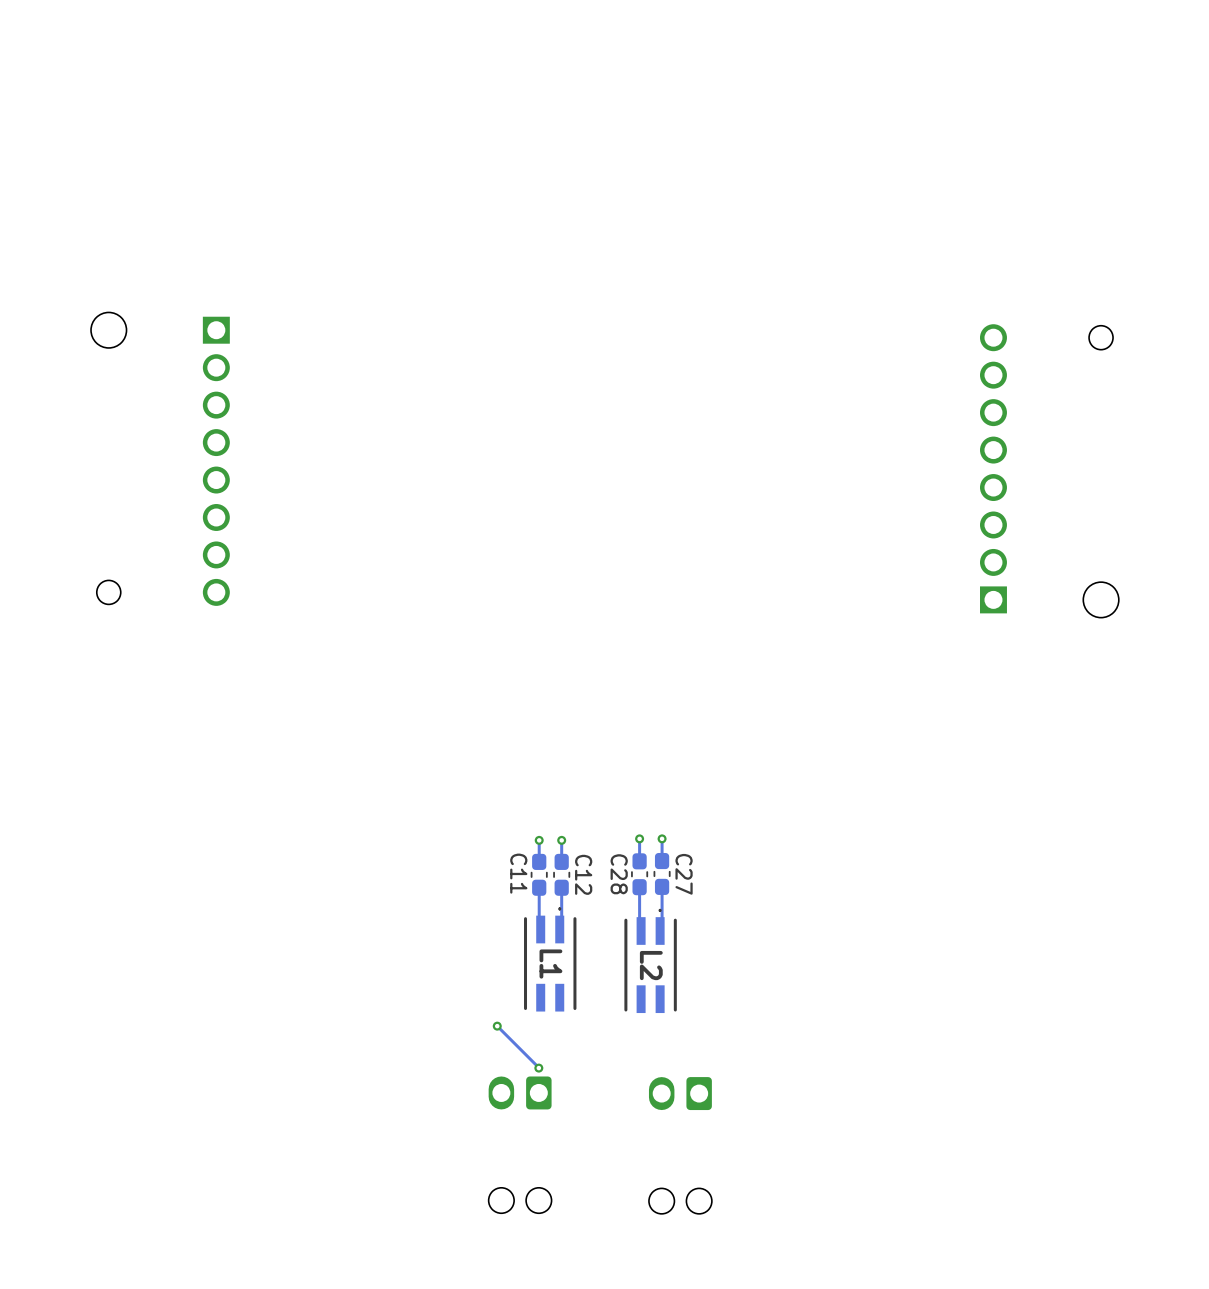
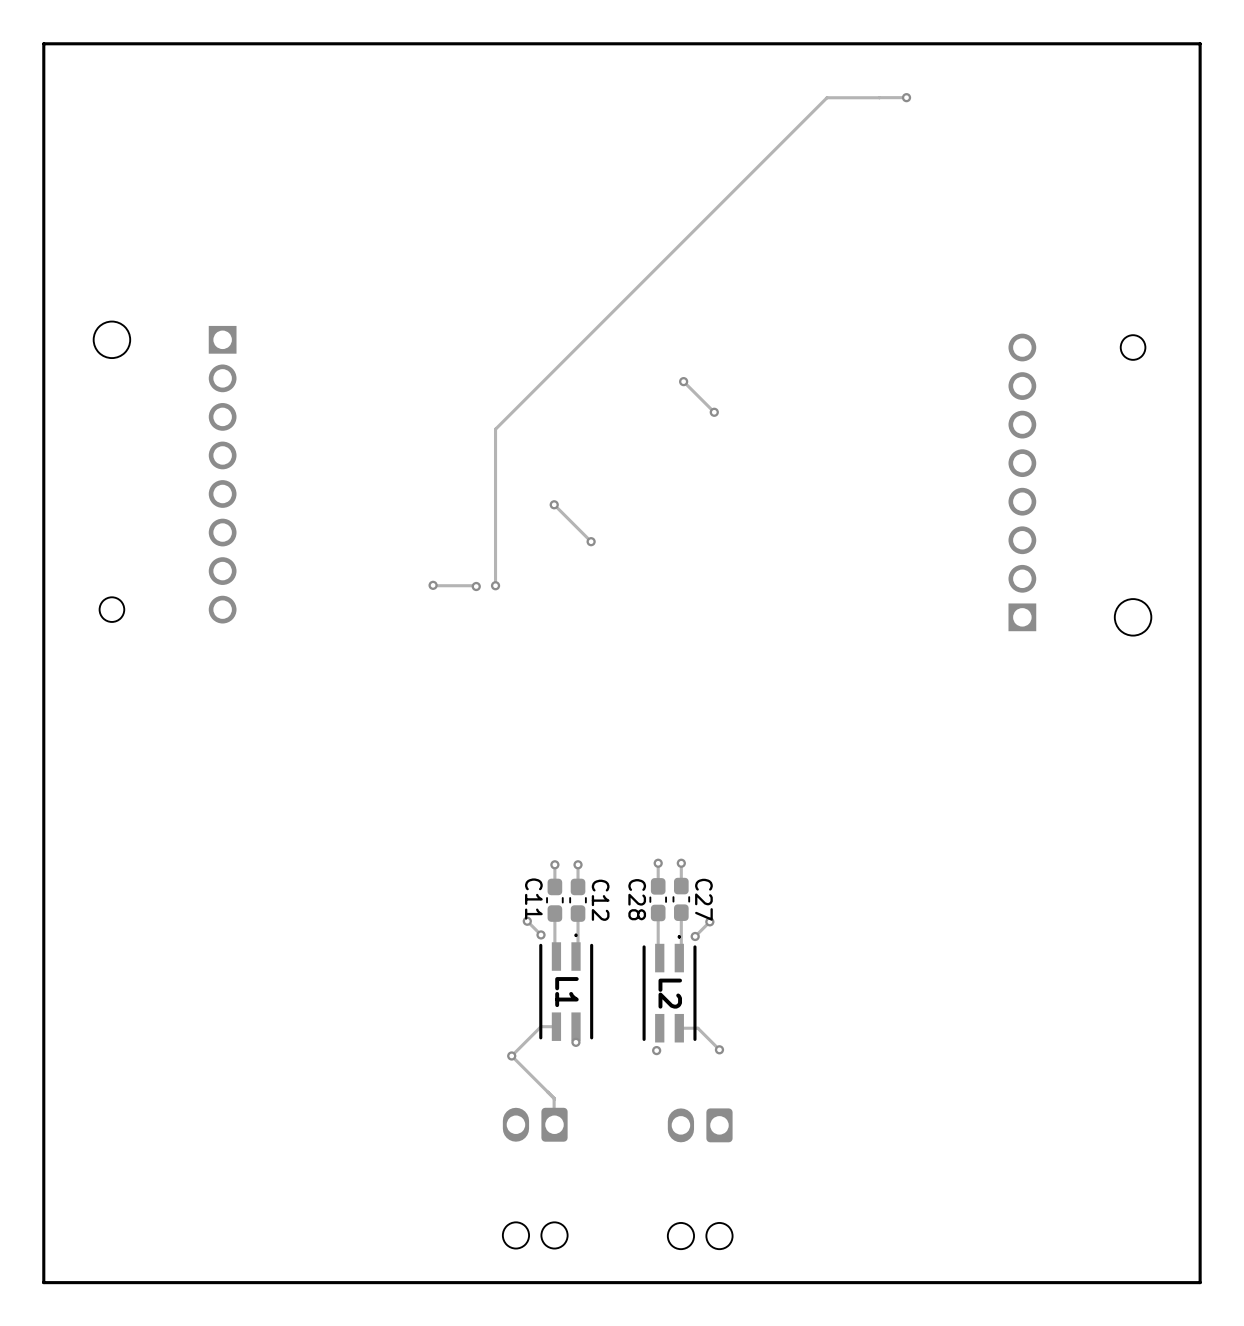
board edge: none -> (1200, 43) (43, 43) (43, 1282) (1200, 1282) (1200, 43)
track: none -> (879, 97) (827, 97) (495, 429) (495, 585)
track: none -> (906, 97) (879, 97)
via: none -> (906, 97)
track: none -> (683, 381) (714, 412)
via: none -> (683, 381)
via: none -> (714, 412)
track: none -> (554, 504) (591, 541)
via: none -> (554, 504)
via: none -> (591, 541)
track: none -> (433, 585) (476, 586)
via: none -> (433, 585)
via: none -> (476, 586)
via: none -> (495, 585)
track: none -> (710, 919) (695, 936)
track: none -> (527, 921) (541, 934)
via: none -> (527, 921)
via: none -> (709, 921)
via: none -> (541, 934)
via: none -> (695, 936)
track: none -> (556, 1026) (541, 1026) (511, 1055)
track: none -> (679, 1028) (697, 1028) (719, 1049)
via: none -> (575, 1042)
via: none -> (656, 1050)
via: none -> (719, 1049)
track: none -> (554, 1098) (554, 1112)
via: (538, 1068) -> none

